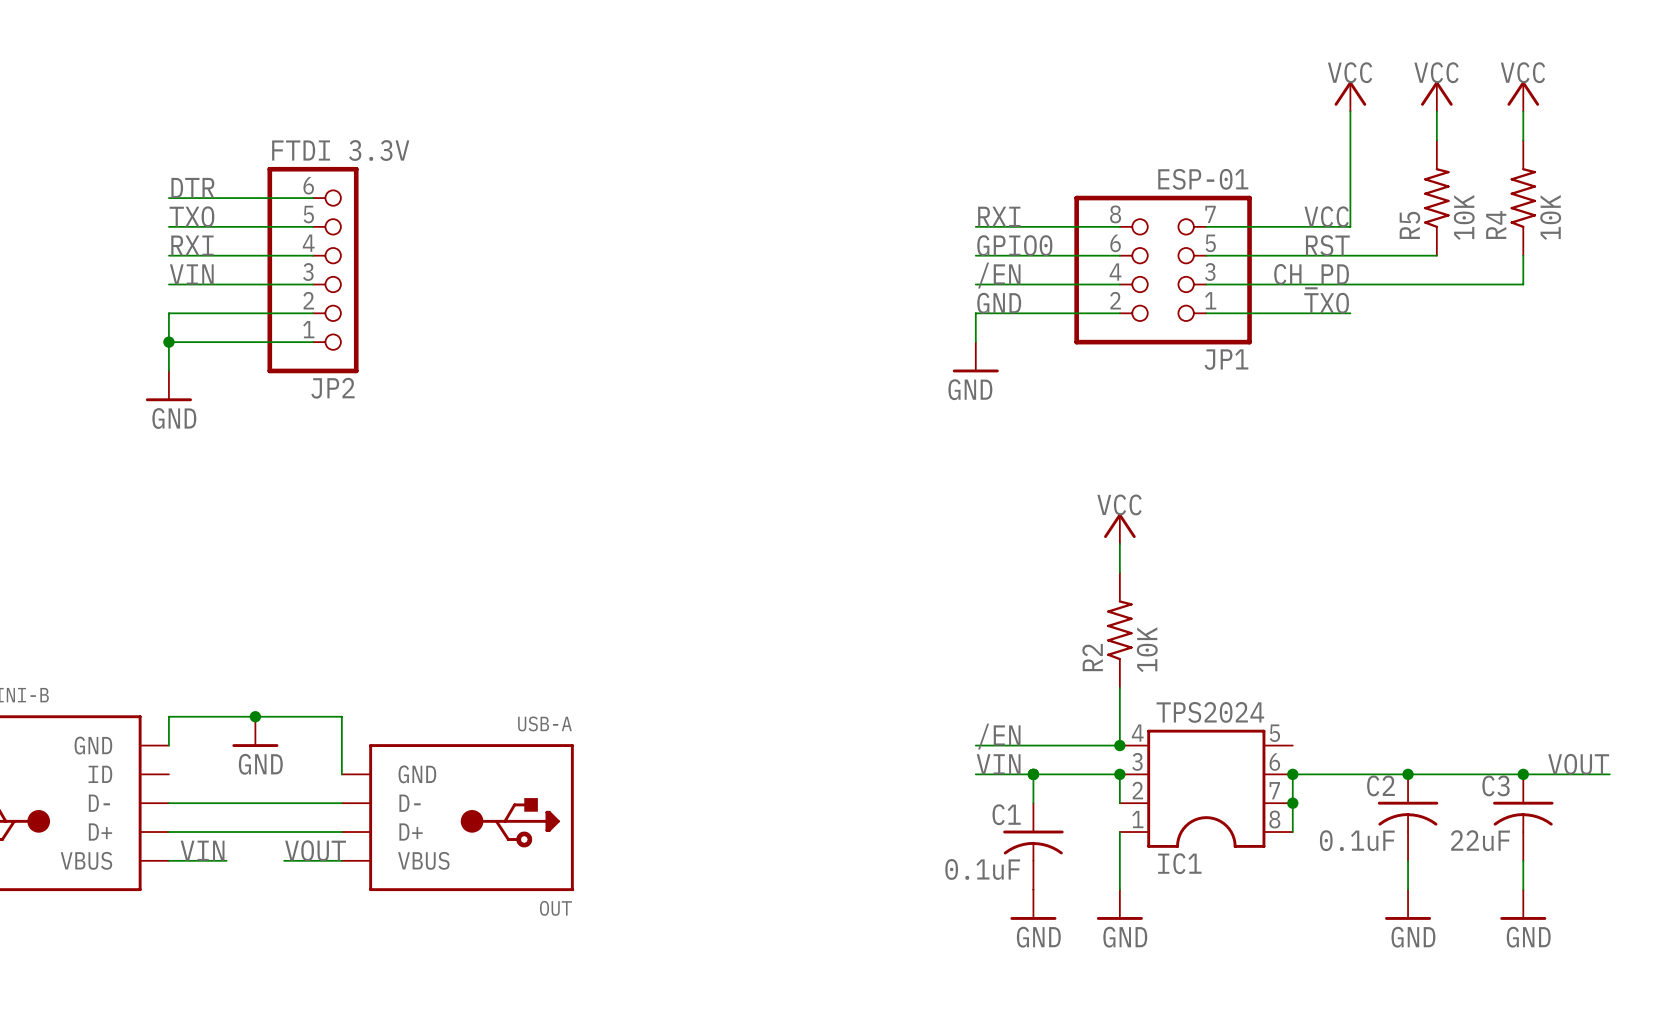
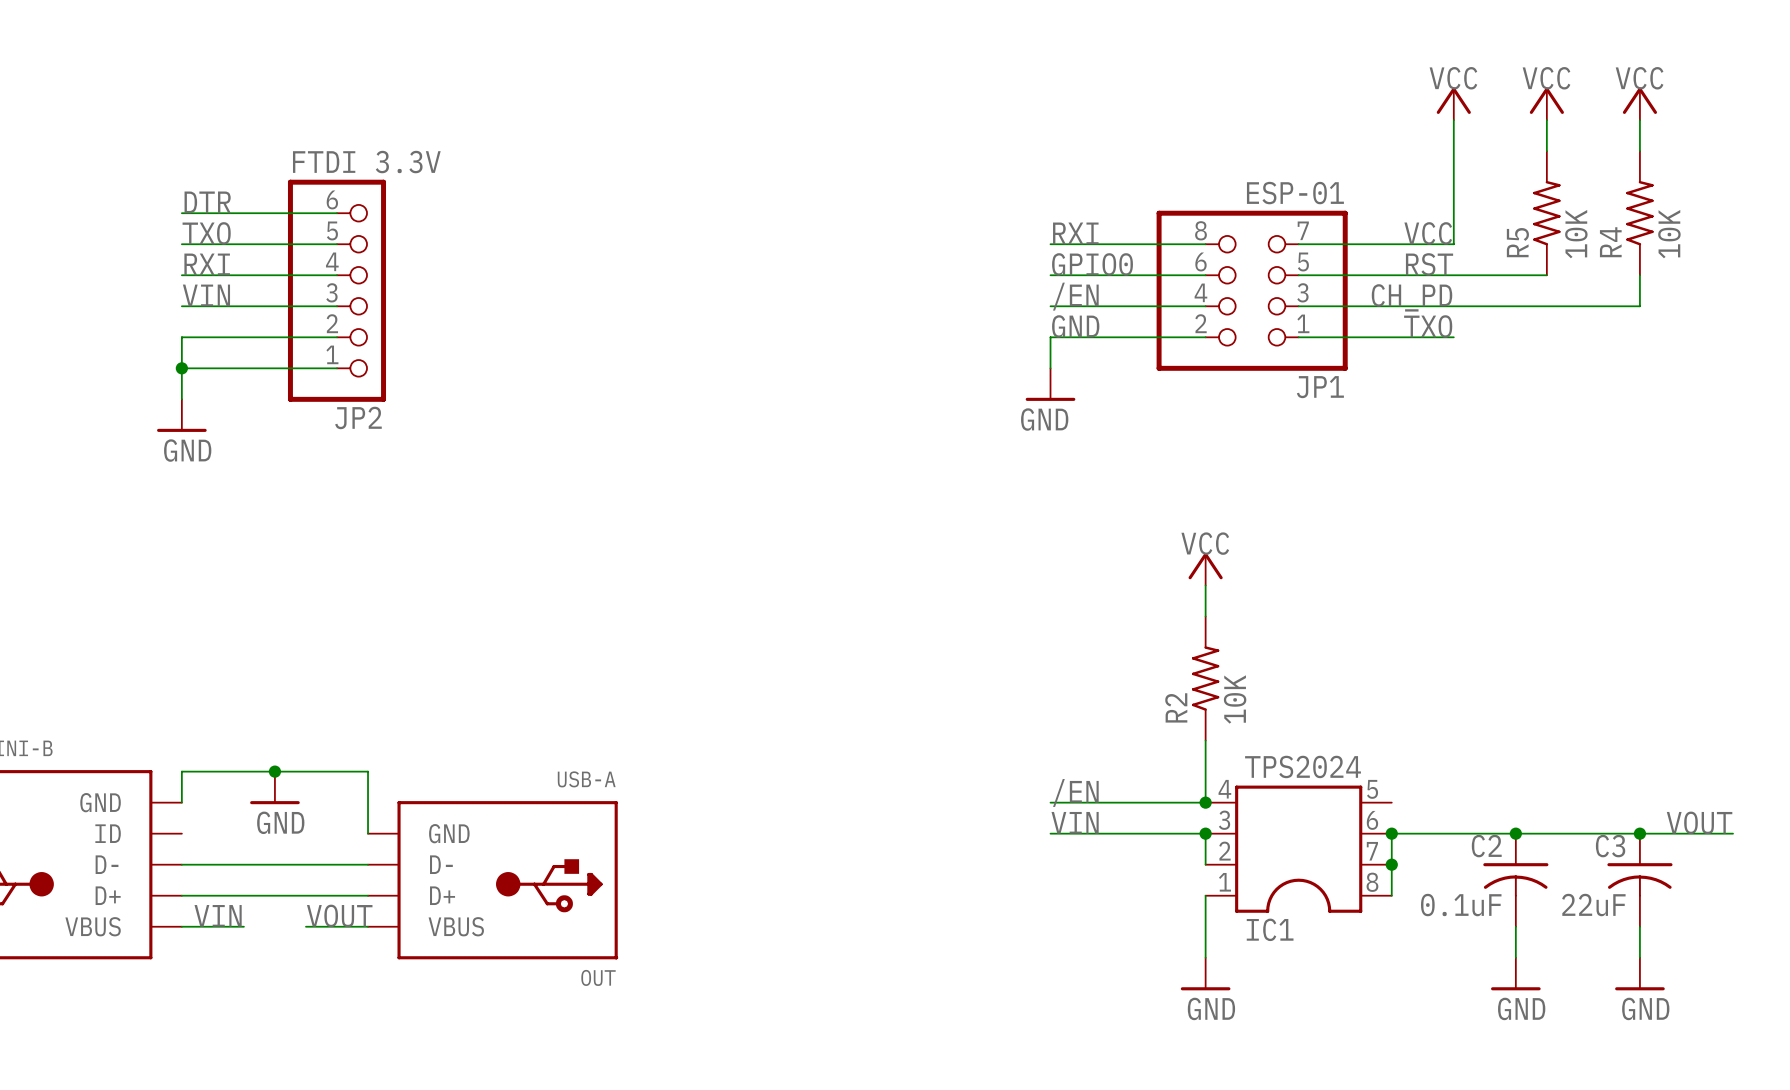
wire: (1033, 774) (1033, 803) -> none
junction: (1033, 774) -> none
C1: 0.1uF (1033, 846) -> none
power symbol: GND (1033, 904) -> none

